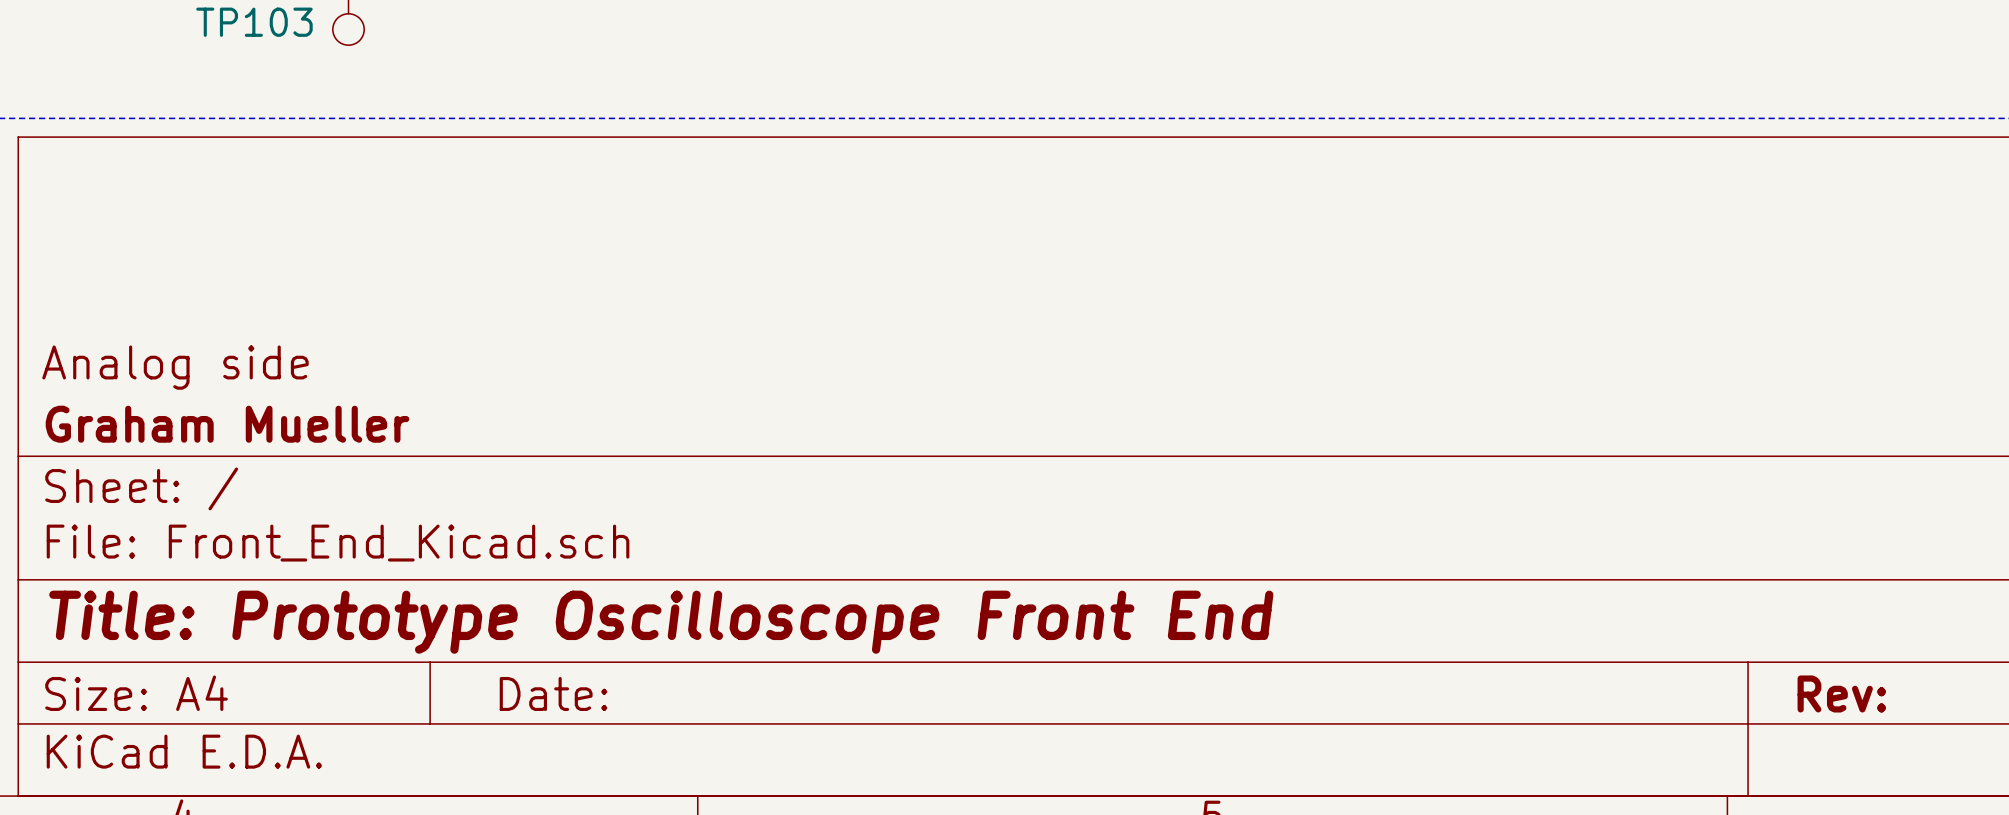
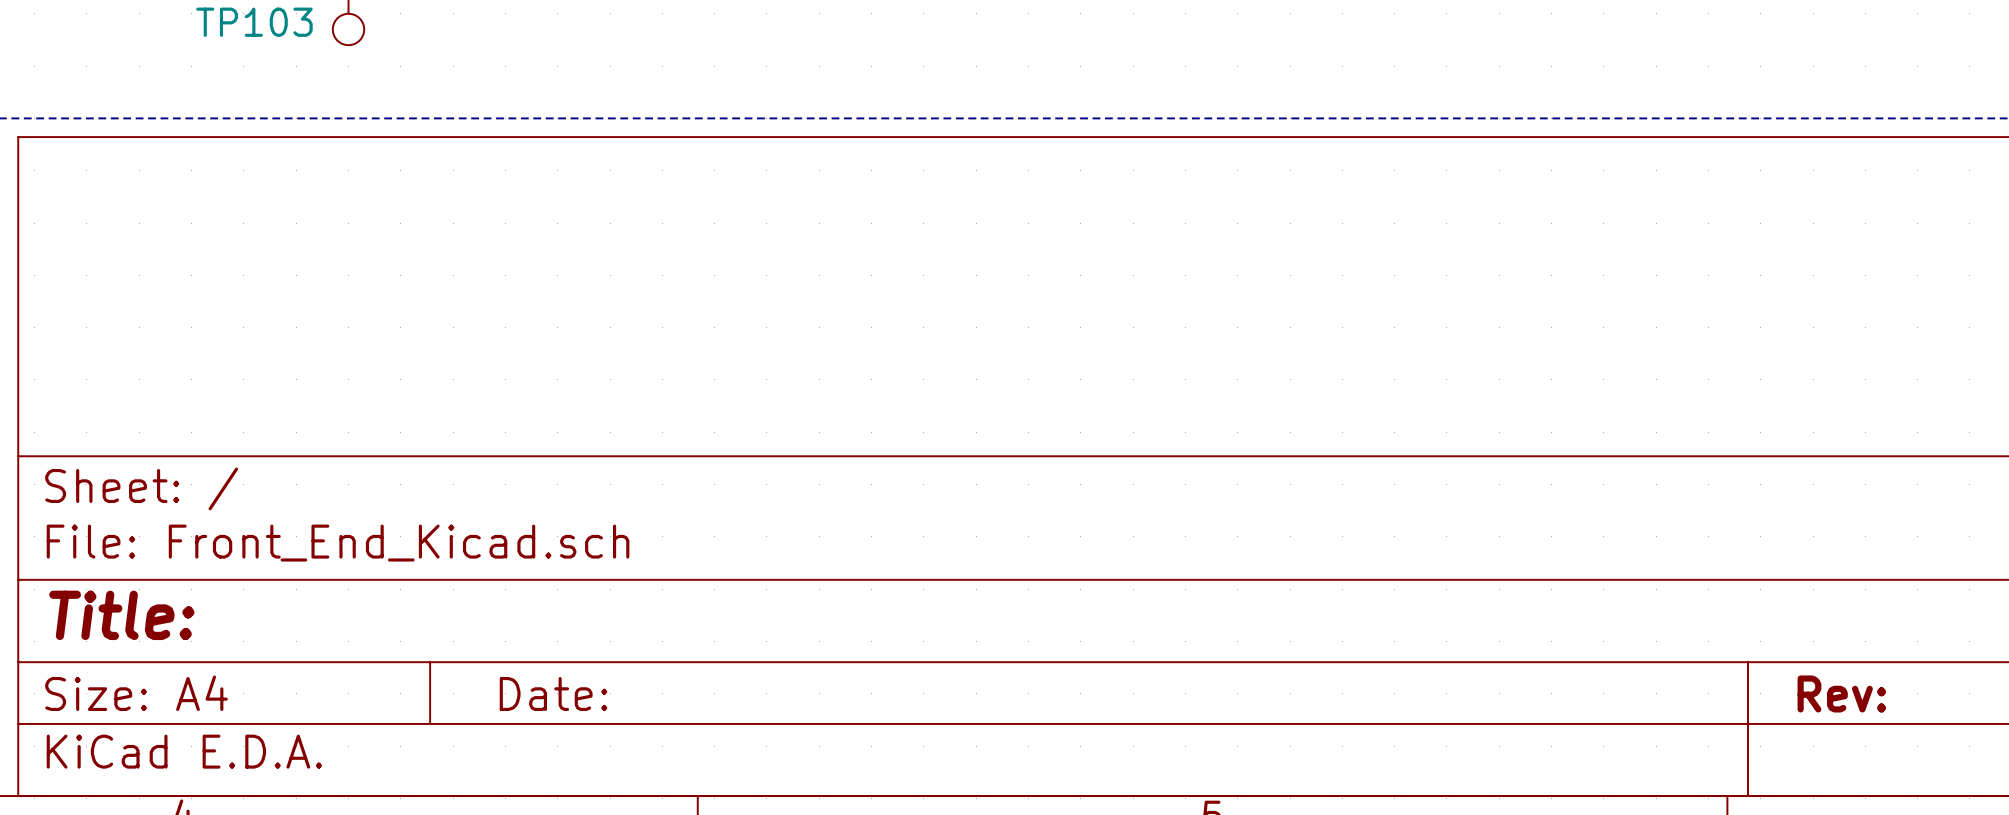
title block: Analog side (175, 367) -> none
title block: Graham Mueller (227, 424) -> none
title block: Title: Prototype Oscilloscope Front End (661, 622) -> Title: (121, 615)

